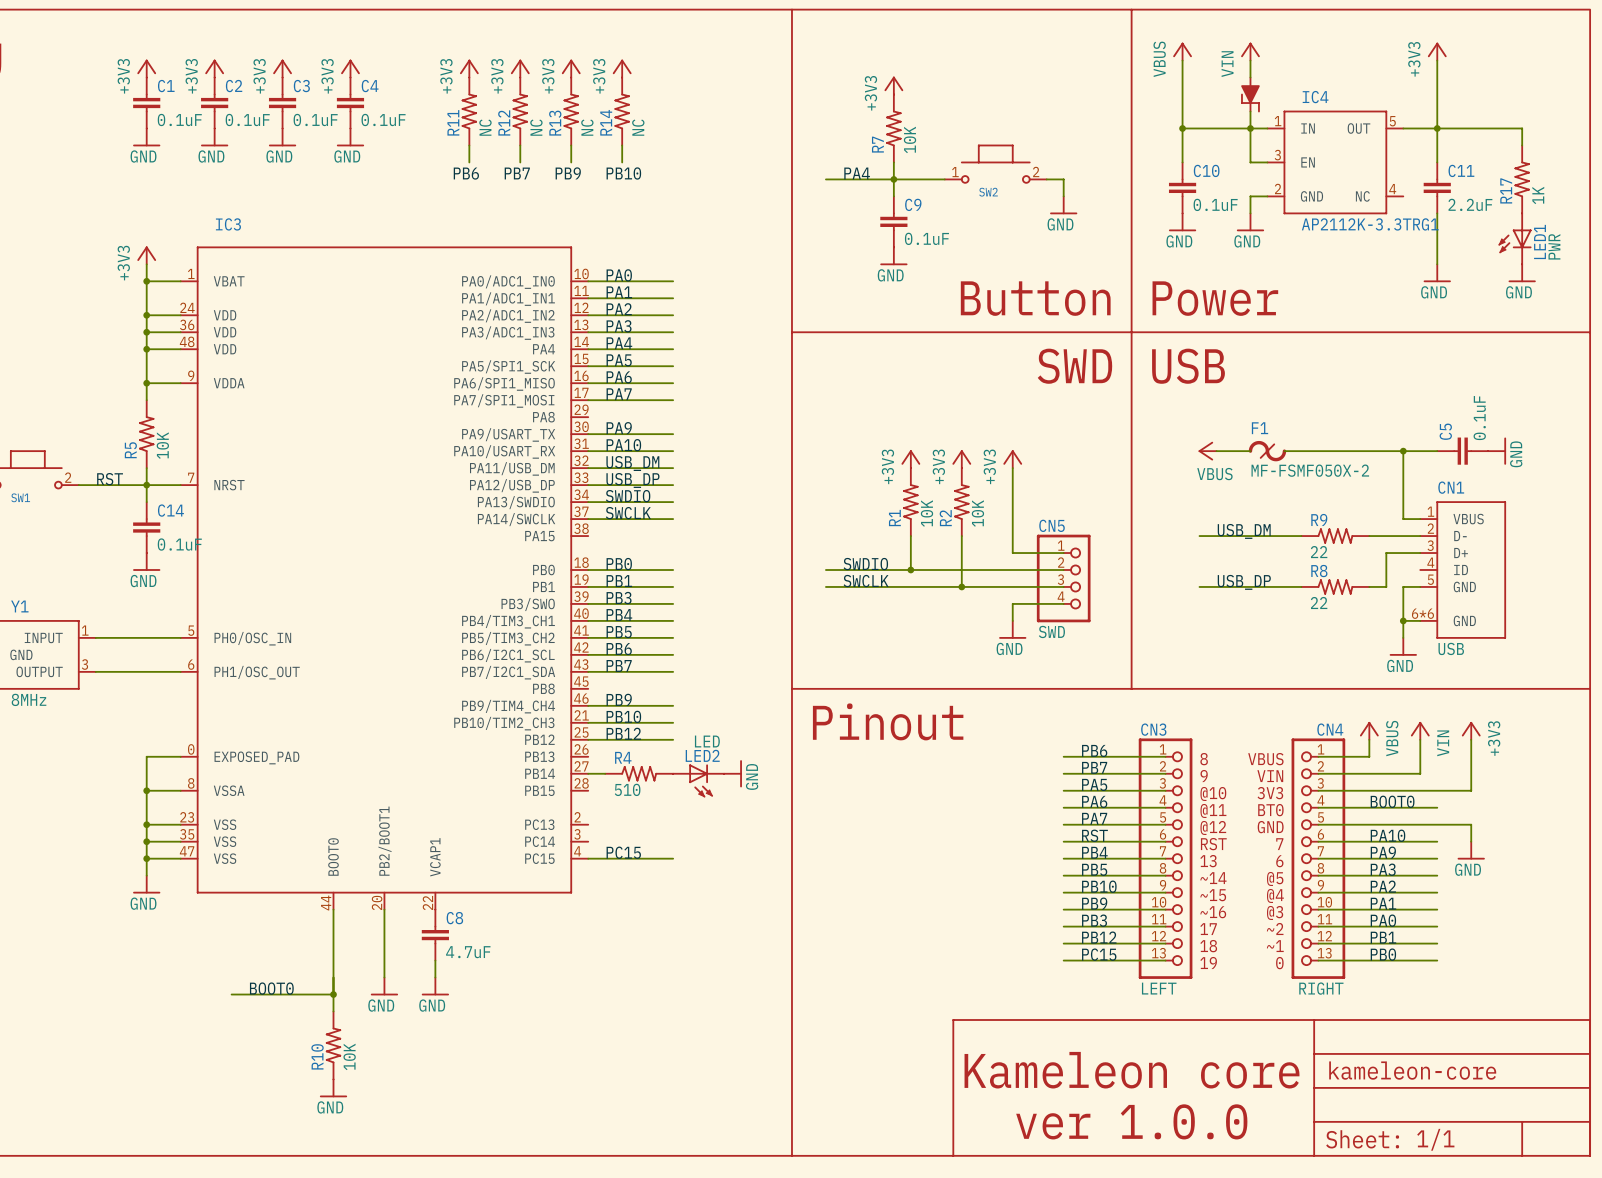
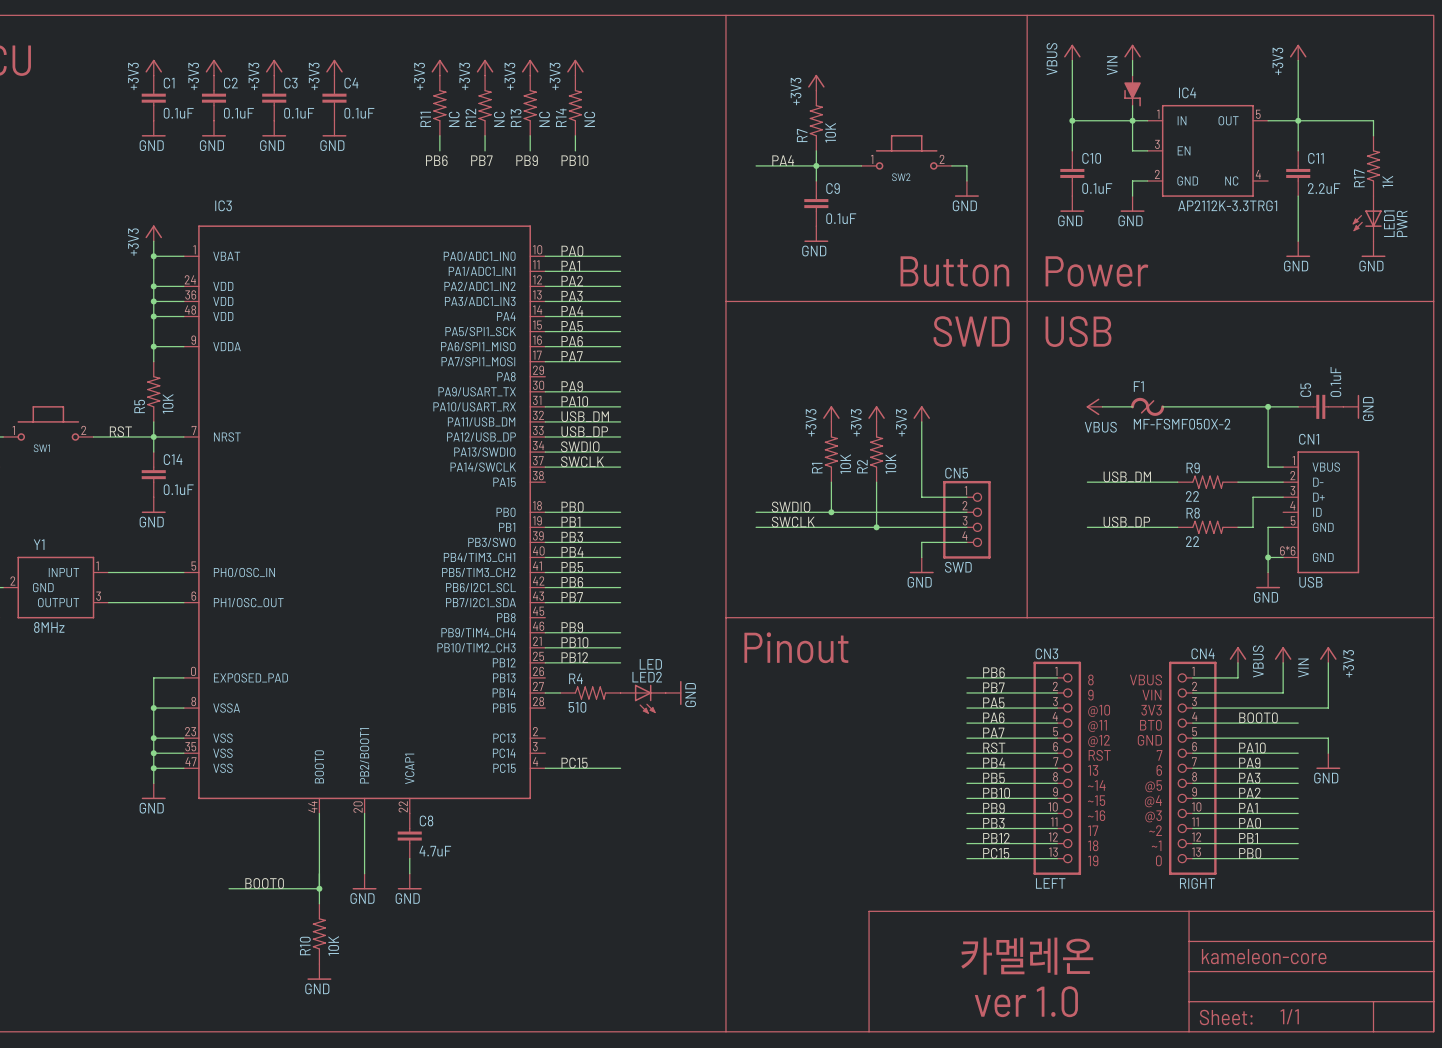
text: Kameleon core (1132, 1070) -> 카멜레온 (1027, 956)
text: ver 1.0.0 (1131, 1121) -> ver 1.0 (1026, 1001)

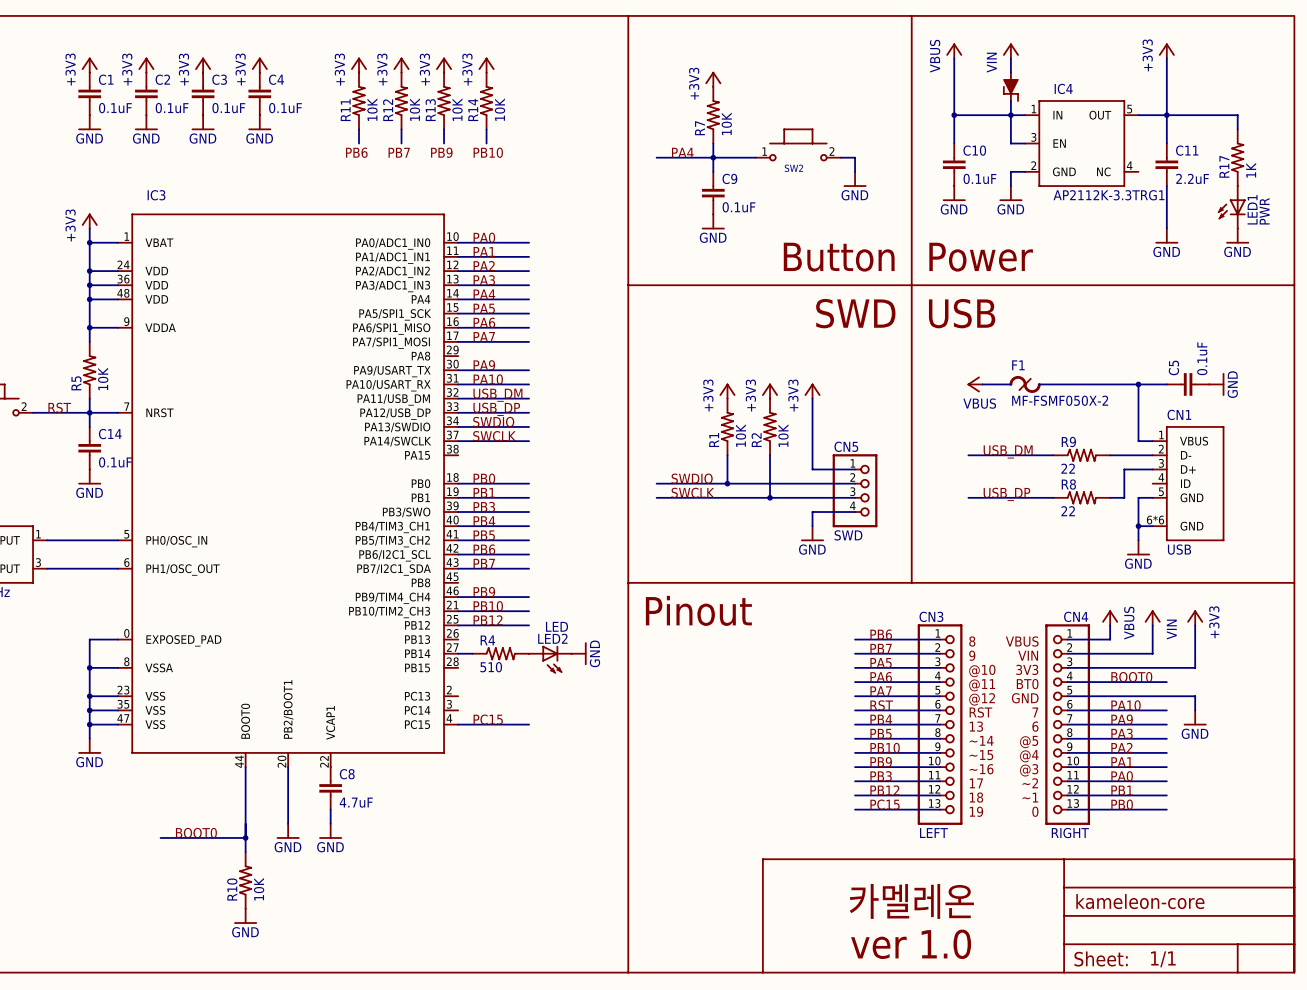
R11 value: NC (454, 119) -> 10K (372, 109)
R12 value: NC (499, 119) -> 10K (414, 109)
R13 value: NC (544, 119) -> 10K (457, 109)
R14 value: NC (589, 119) -> 10K (500, 109)

